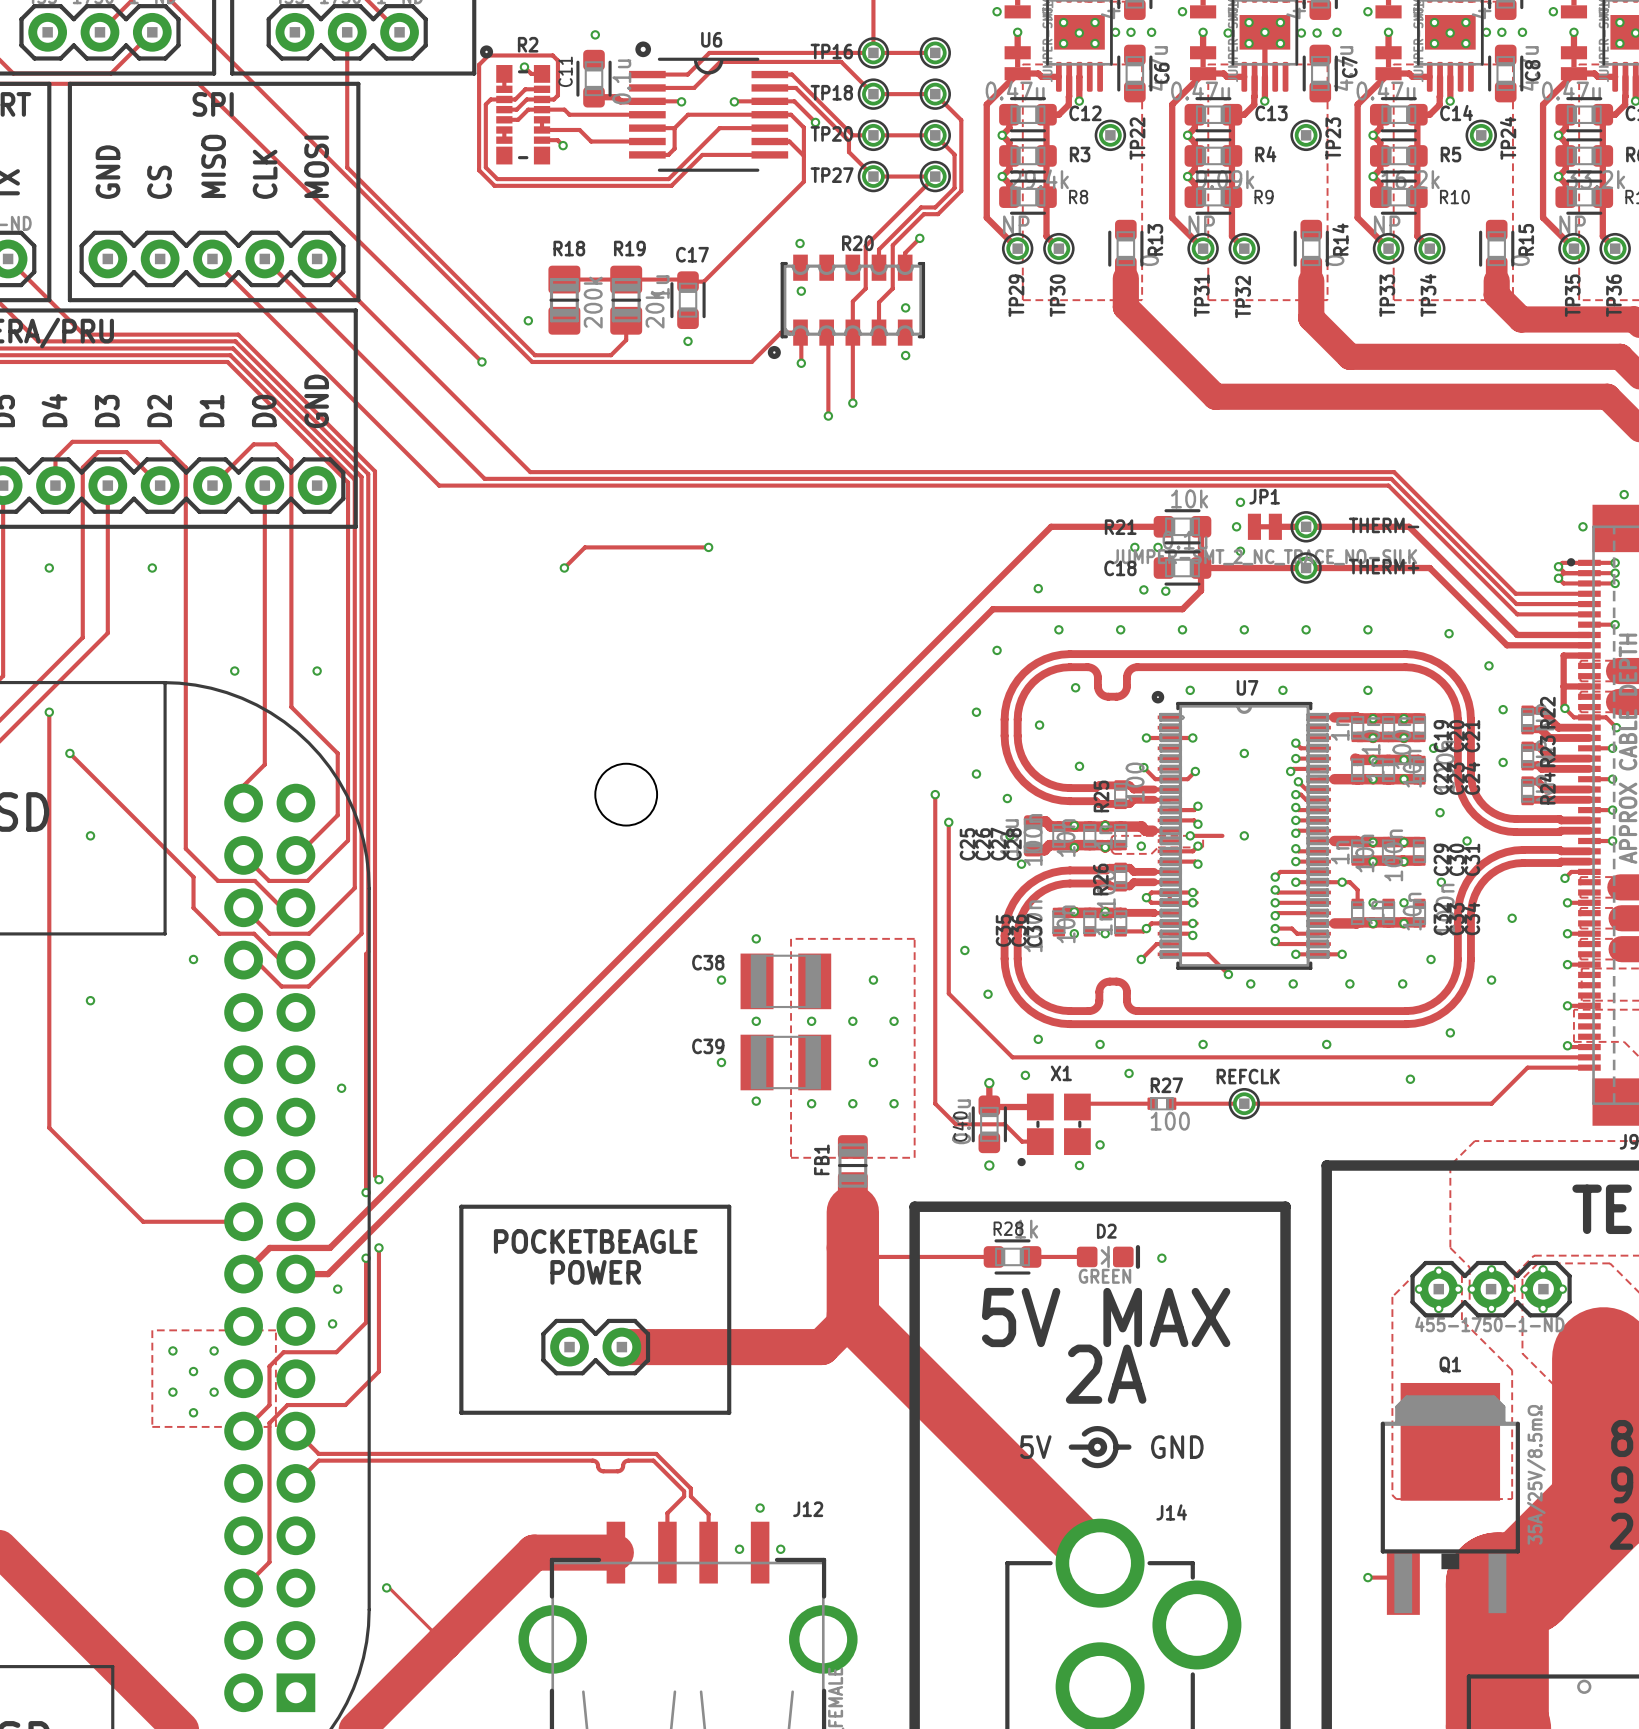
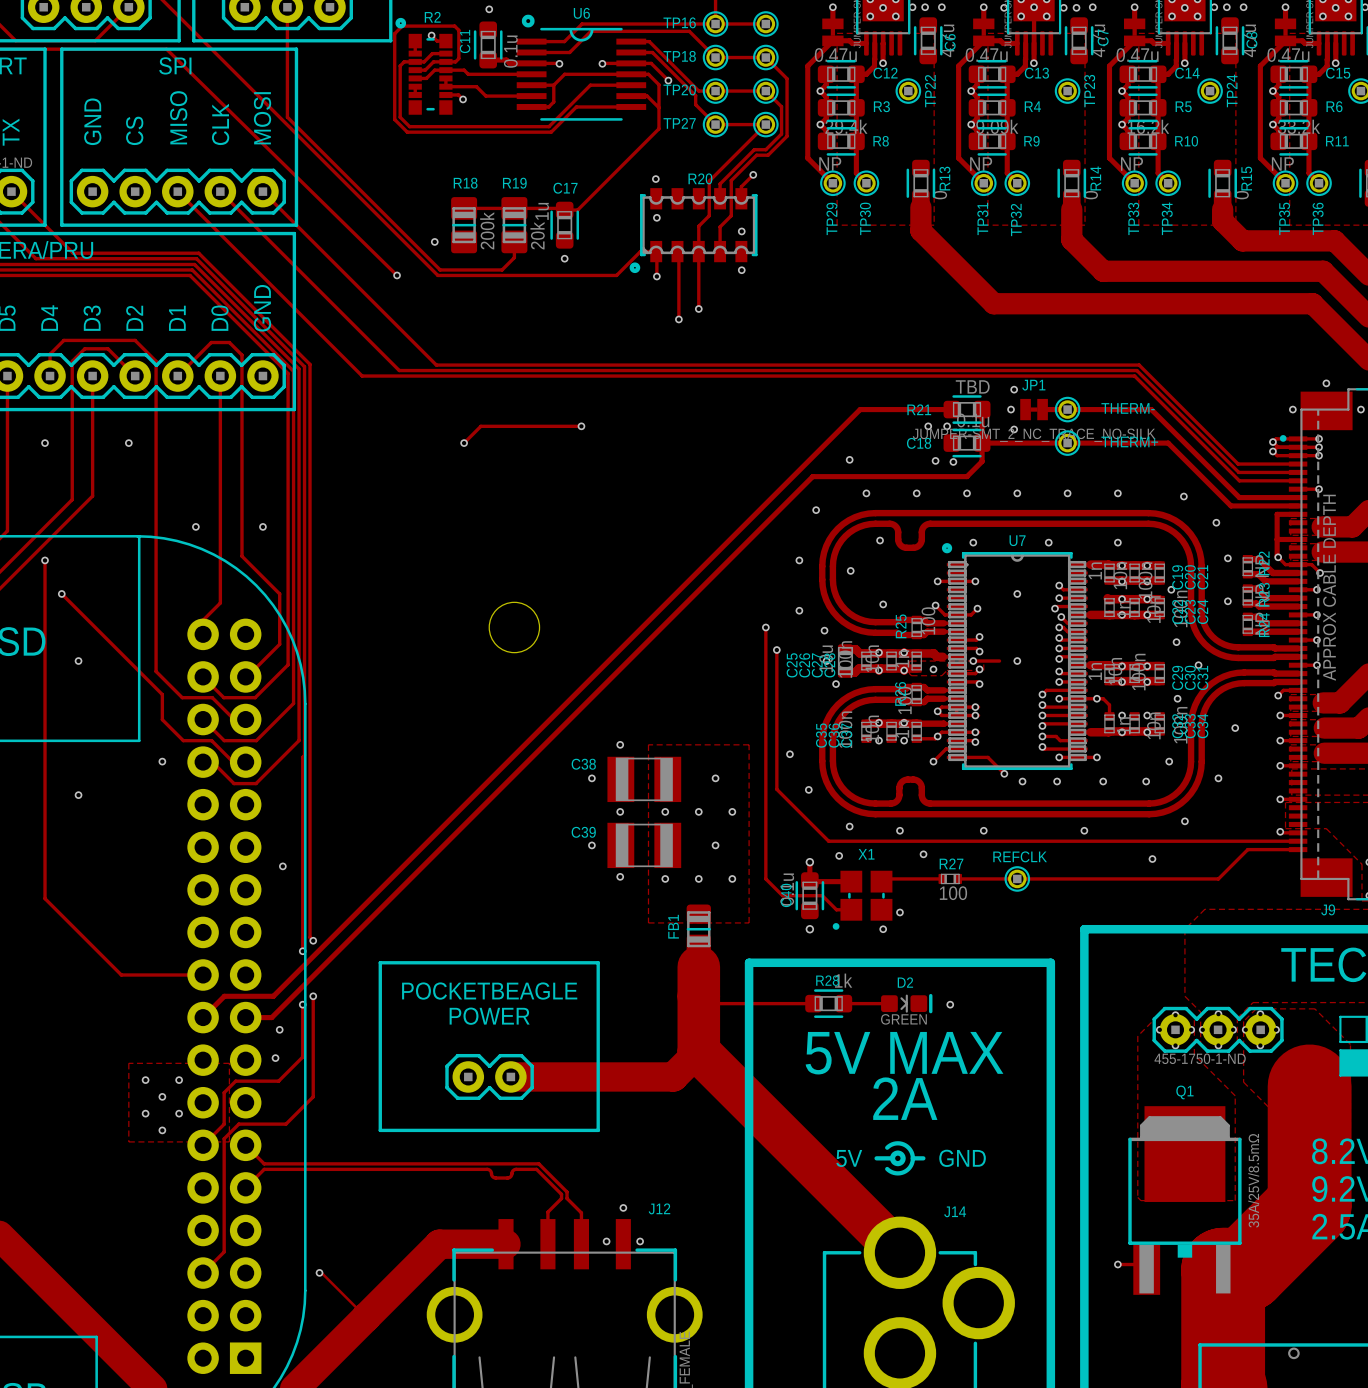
R21 value: 10k (1189, 498) -> TBD (972, 386)

